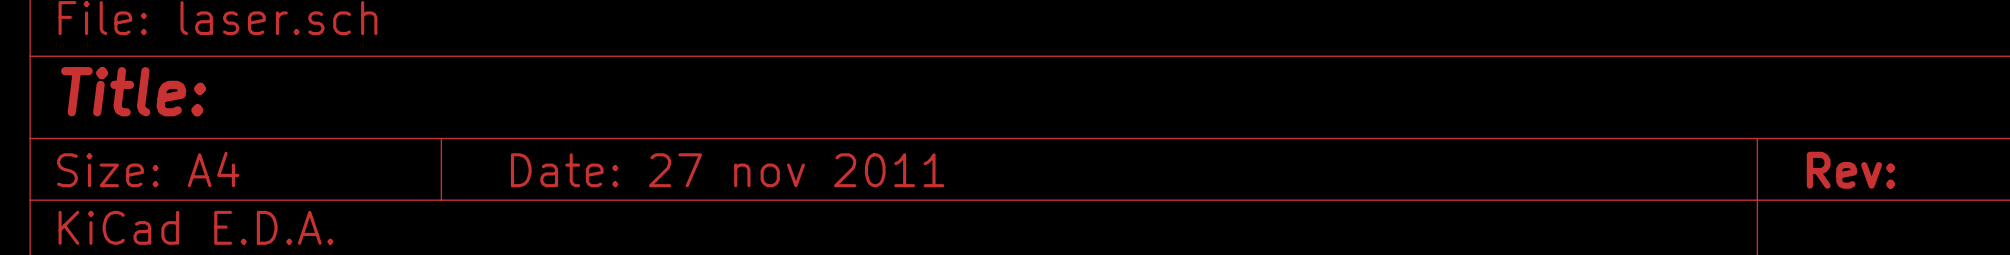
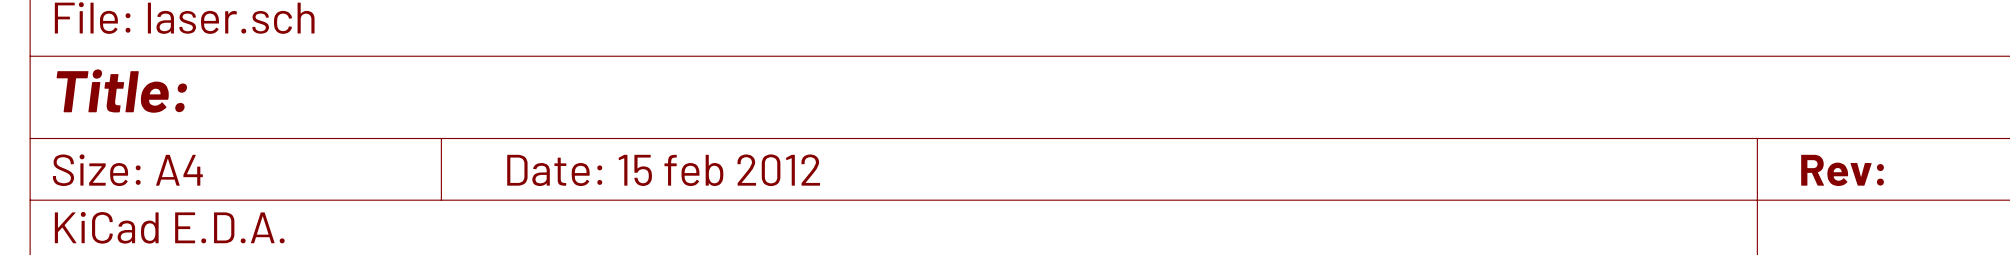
title block: Date: 27 nov 2011 (727, 170) -> Date: 15 feb 2012 (663, 170)

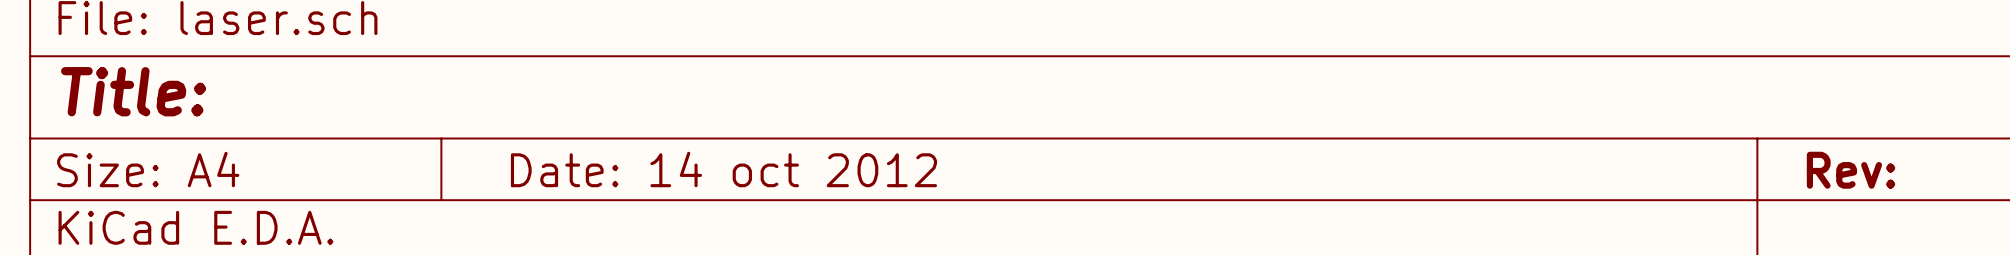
title block: Date: 15 feb 2012 (663, 170) -> Date: 14 oct 2012 (723, 169)

